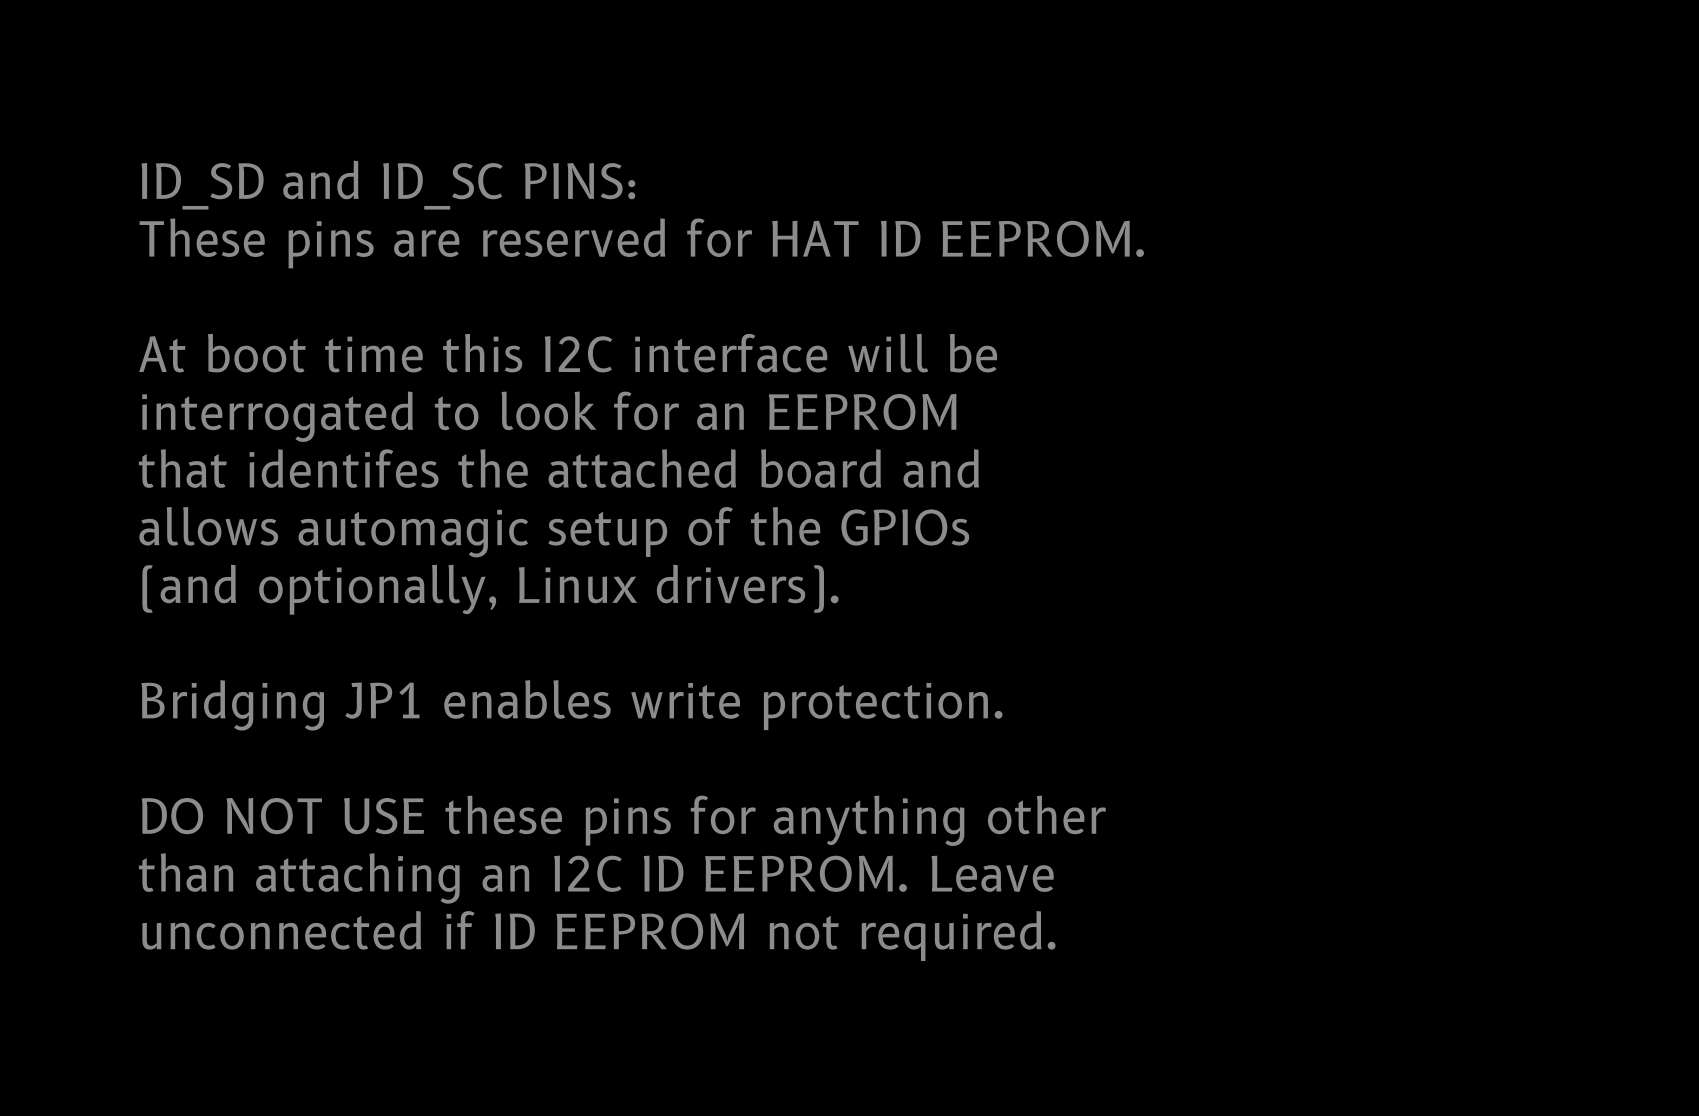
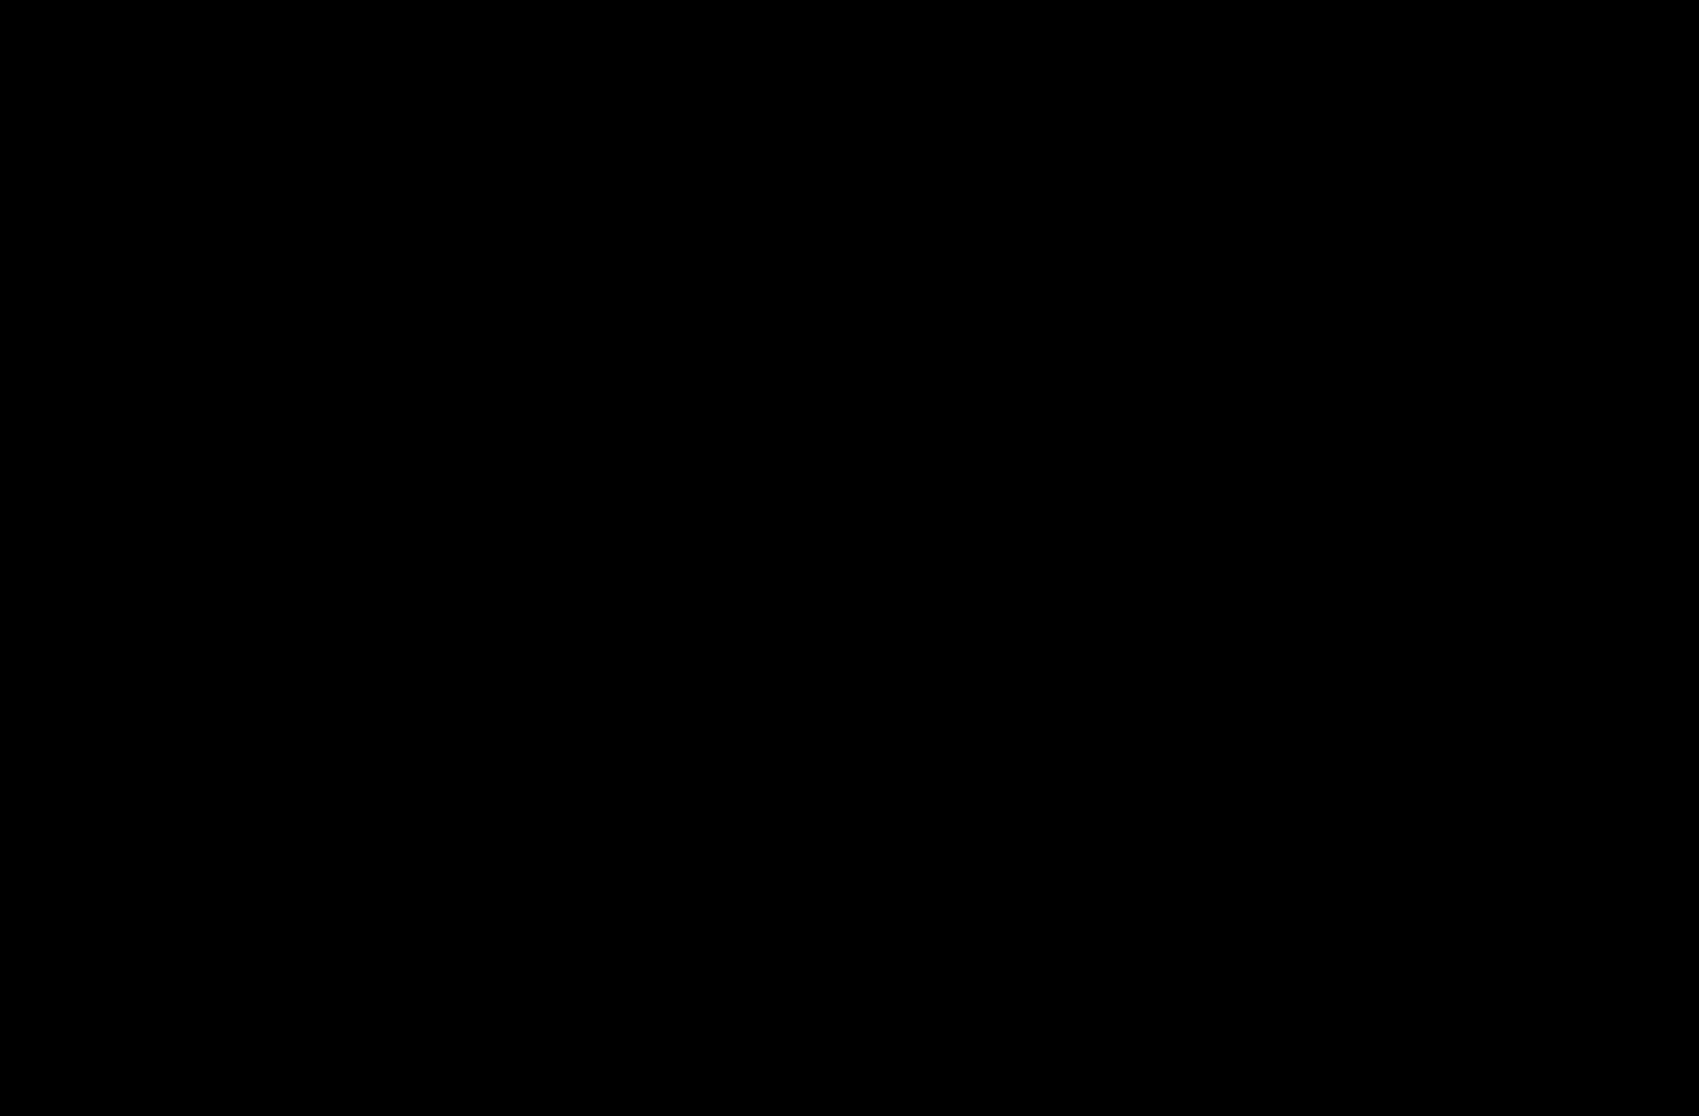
text: ID_SD and ID_SC PINS: (388, 185) -> none
text: These pins are reserved for HAT ID EEPROM. (641, 243) -> none
text: At boot time this I2C interface will be (568, 353) -> none
text: interrogated to look for an EEPROM (549, 416) -> none
text: that identifes the attached board and (558, 468) -> none
text: allows automagic setup of the GPIOs (554, 532) -> none
text: (and optionally, Linux drivers). (490, 589) -> none
text: Bridging JP1 enables write protection. (571, 705) -> none
text: DO NOT USE these pins for anything other (623, 820) -> none
text: than attaching an I2C ID EEPROM. Leave (596, 878) -> none
text: unconnected if ID EEPROM not required. (598, 936) -> none

